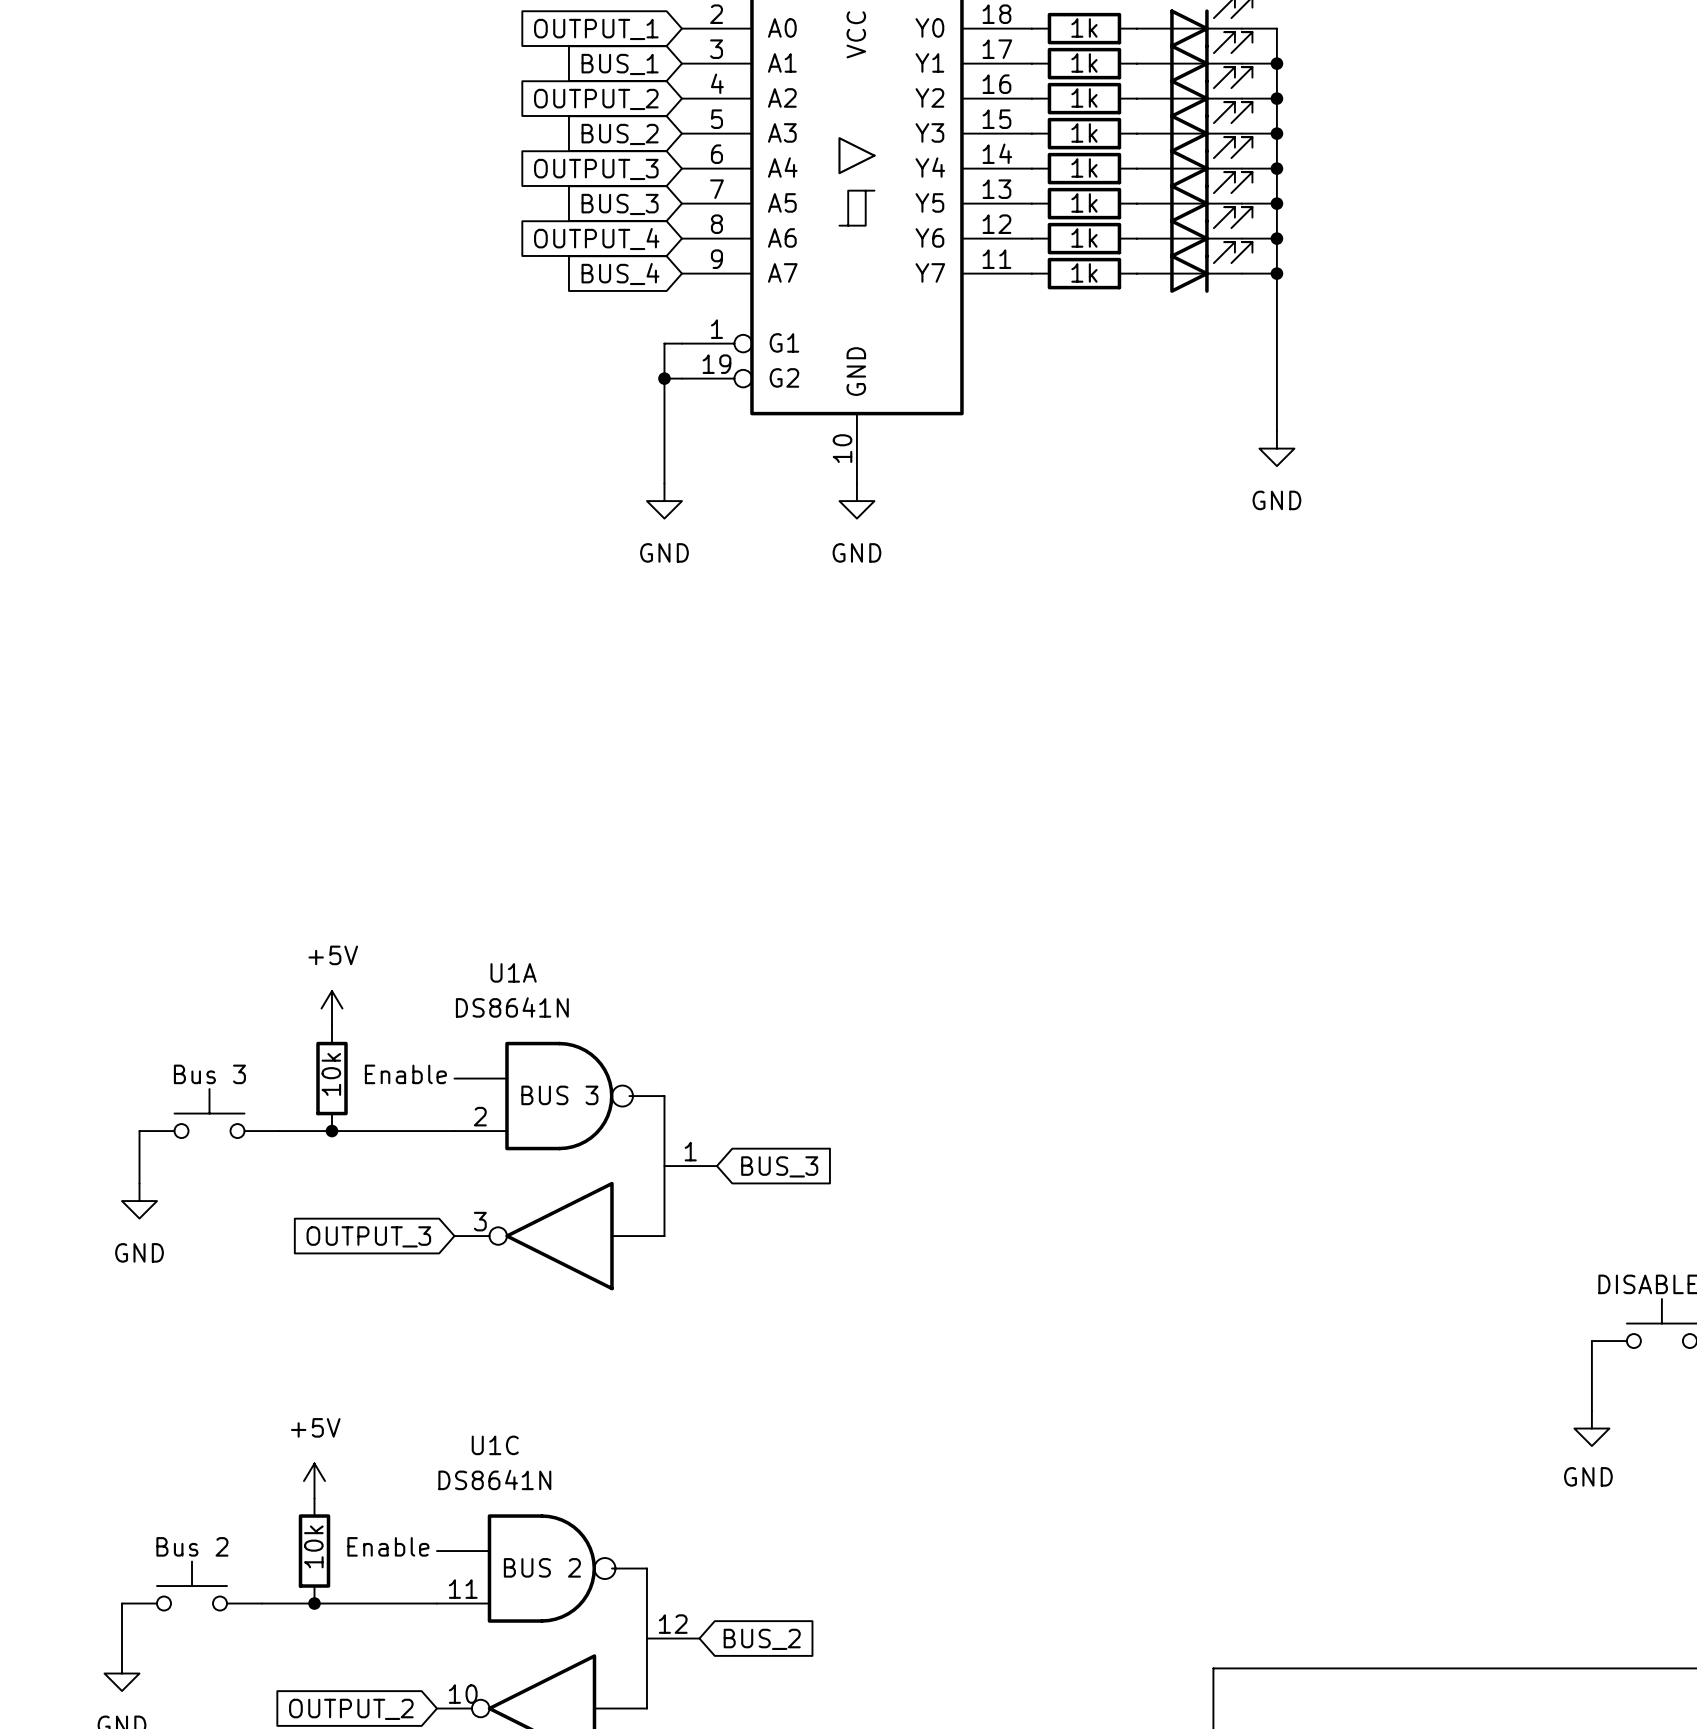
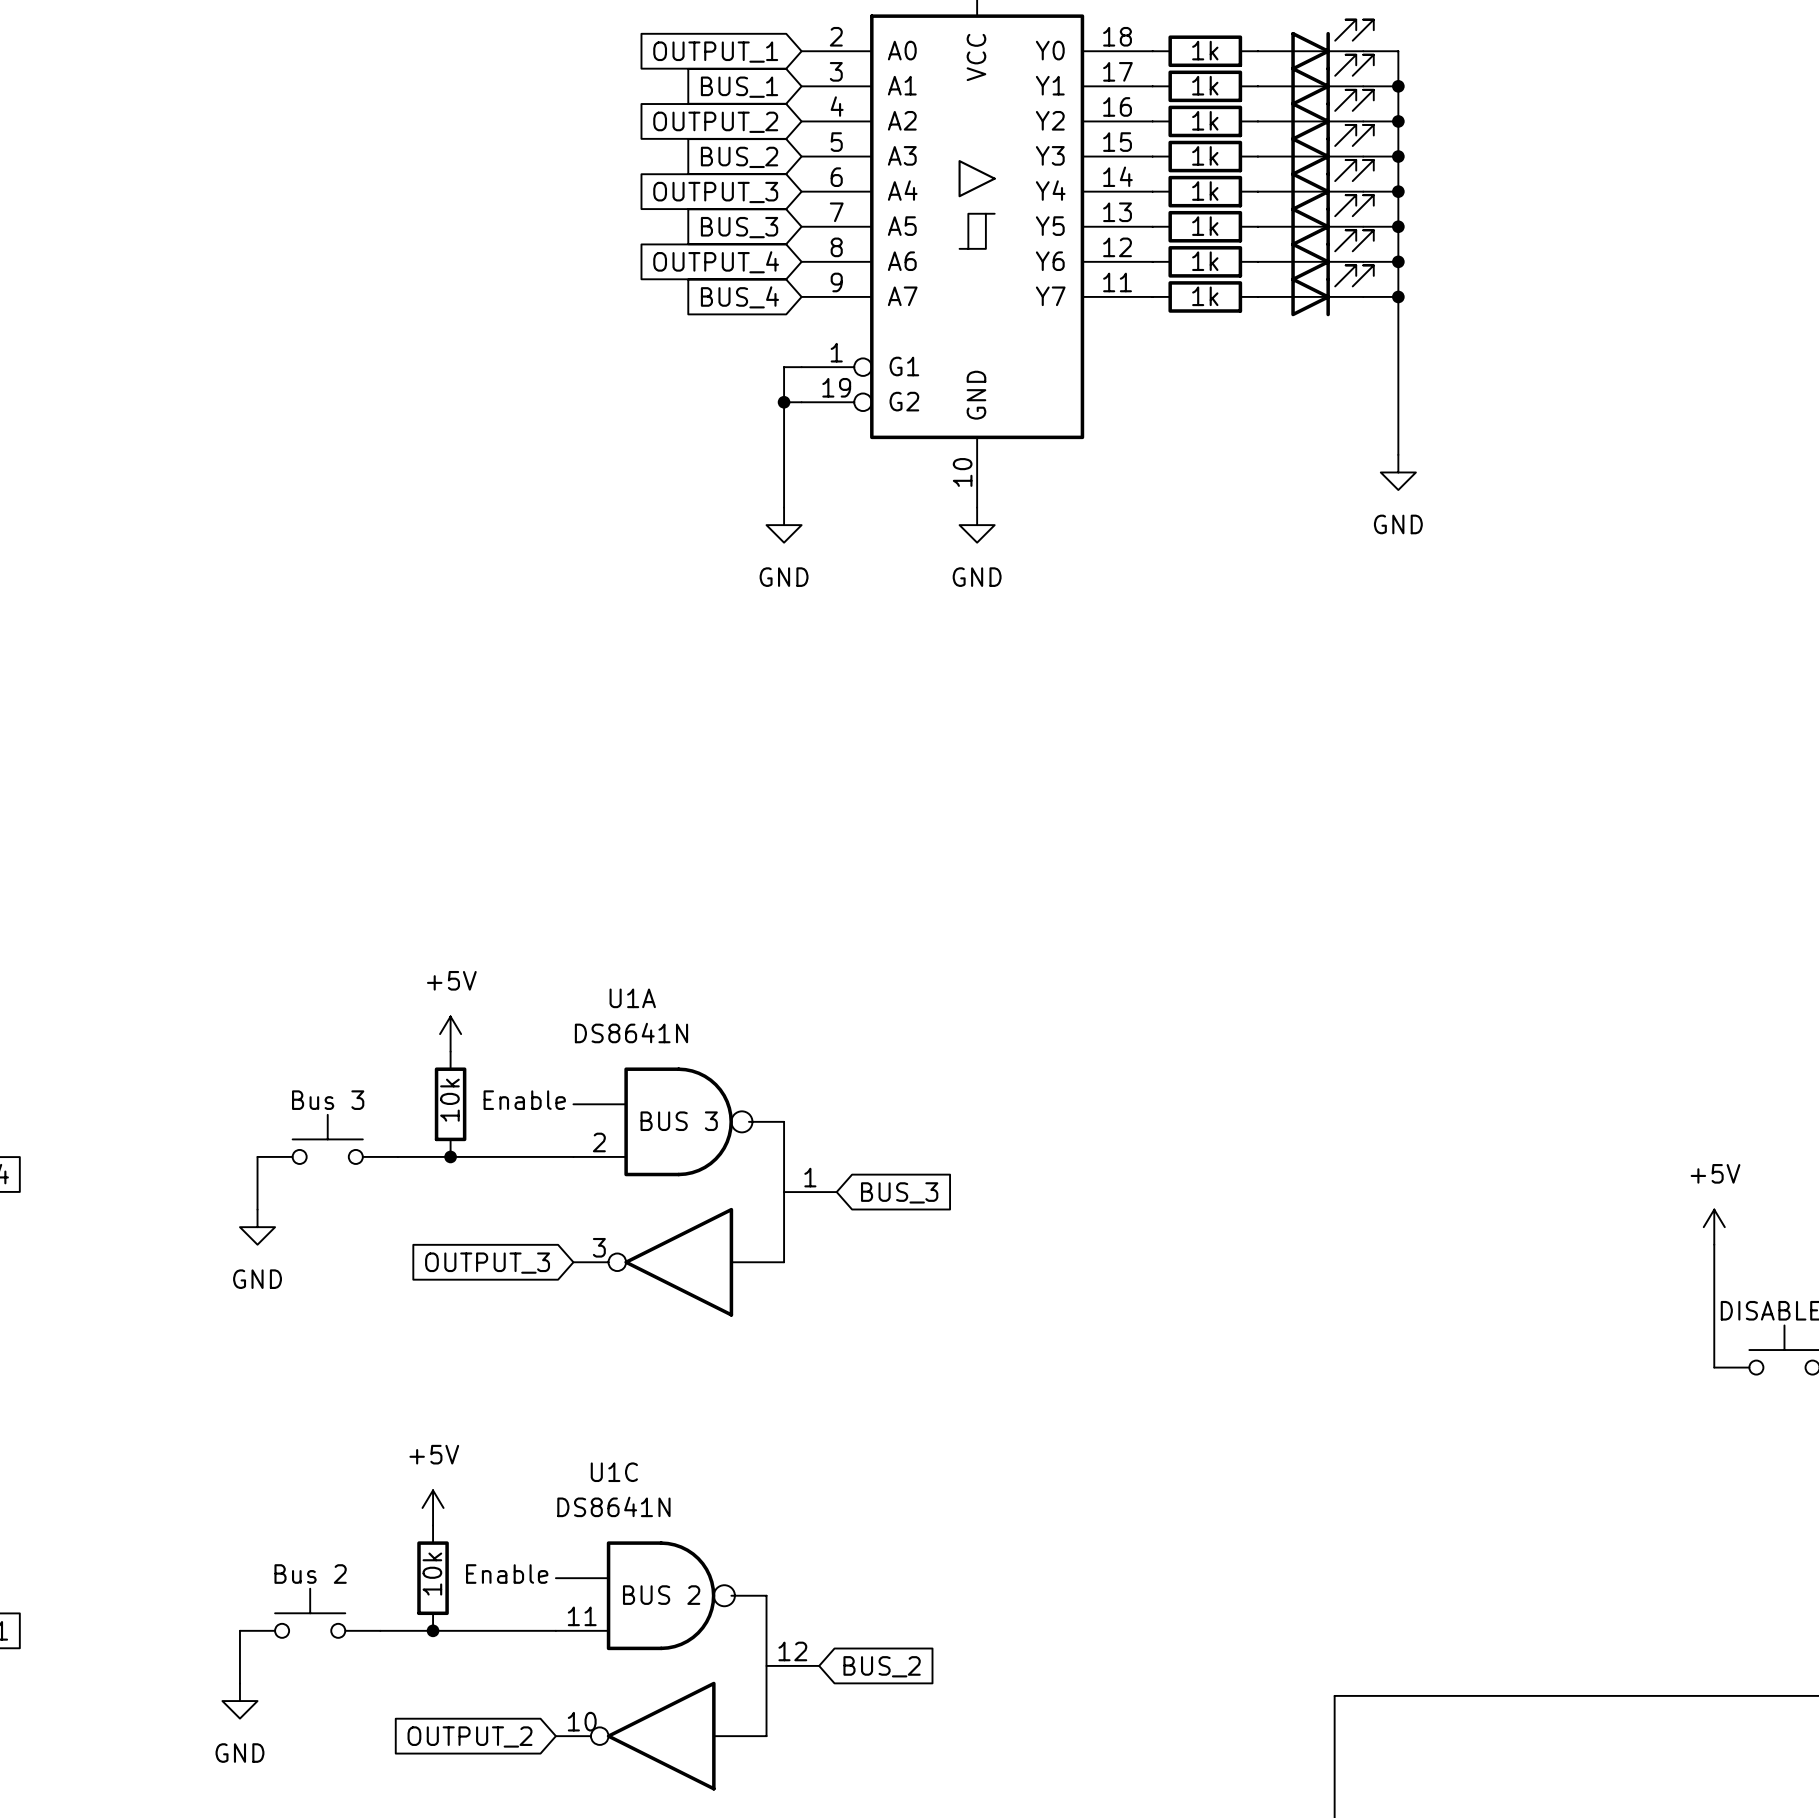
power symbol: none -> +5V (1714, 1227)
wire: (1591, 1341) (1591, 1411) -> (1714, 1367) (1714, 1244)
power symbol: GND (1591, 1428) -> none

